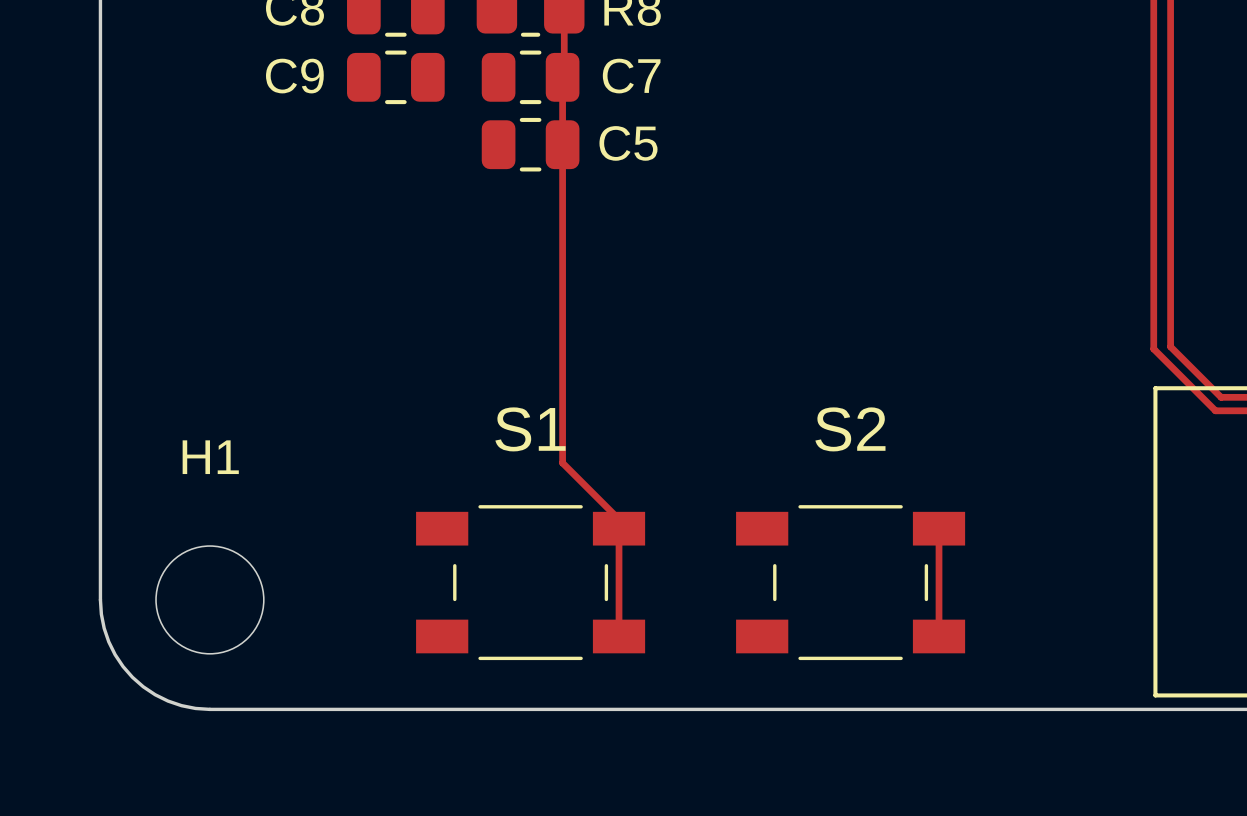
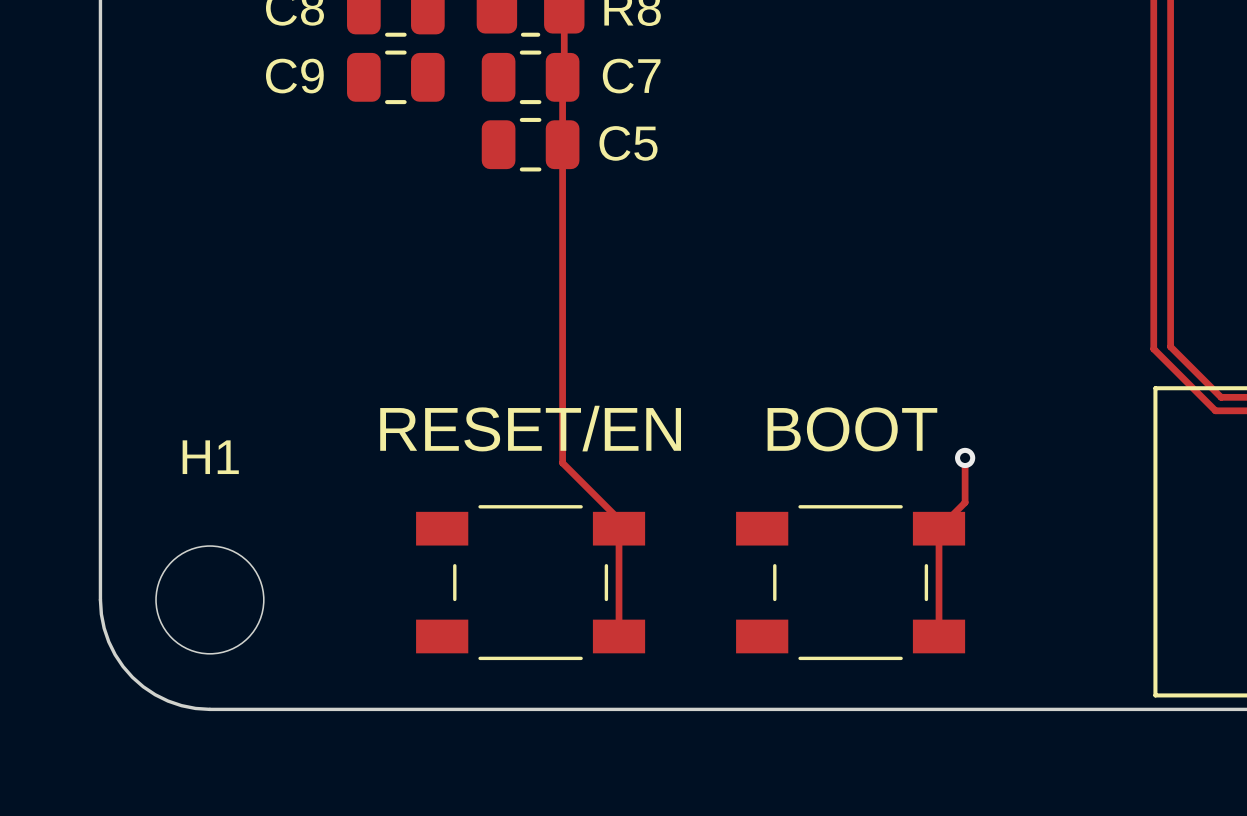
S1 name: S1 (530, 429) -> RESET/EN (530, 428)
S2 name: S2 (850, 429) -> BOOT (852, 429)
track: none -> (965, 457) (965, 502) (939, 528)
via: none -> (965, 457)

